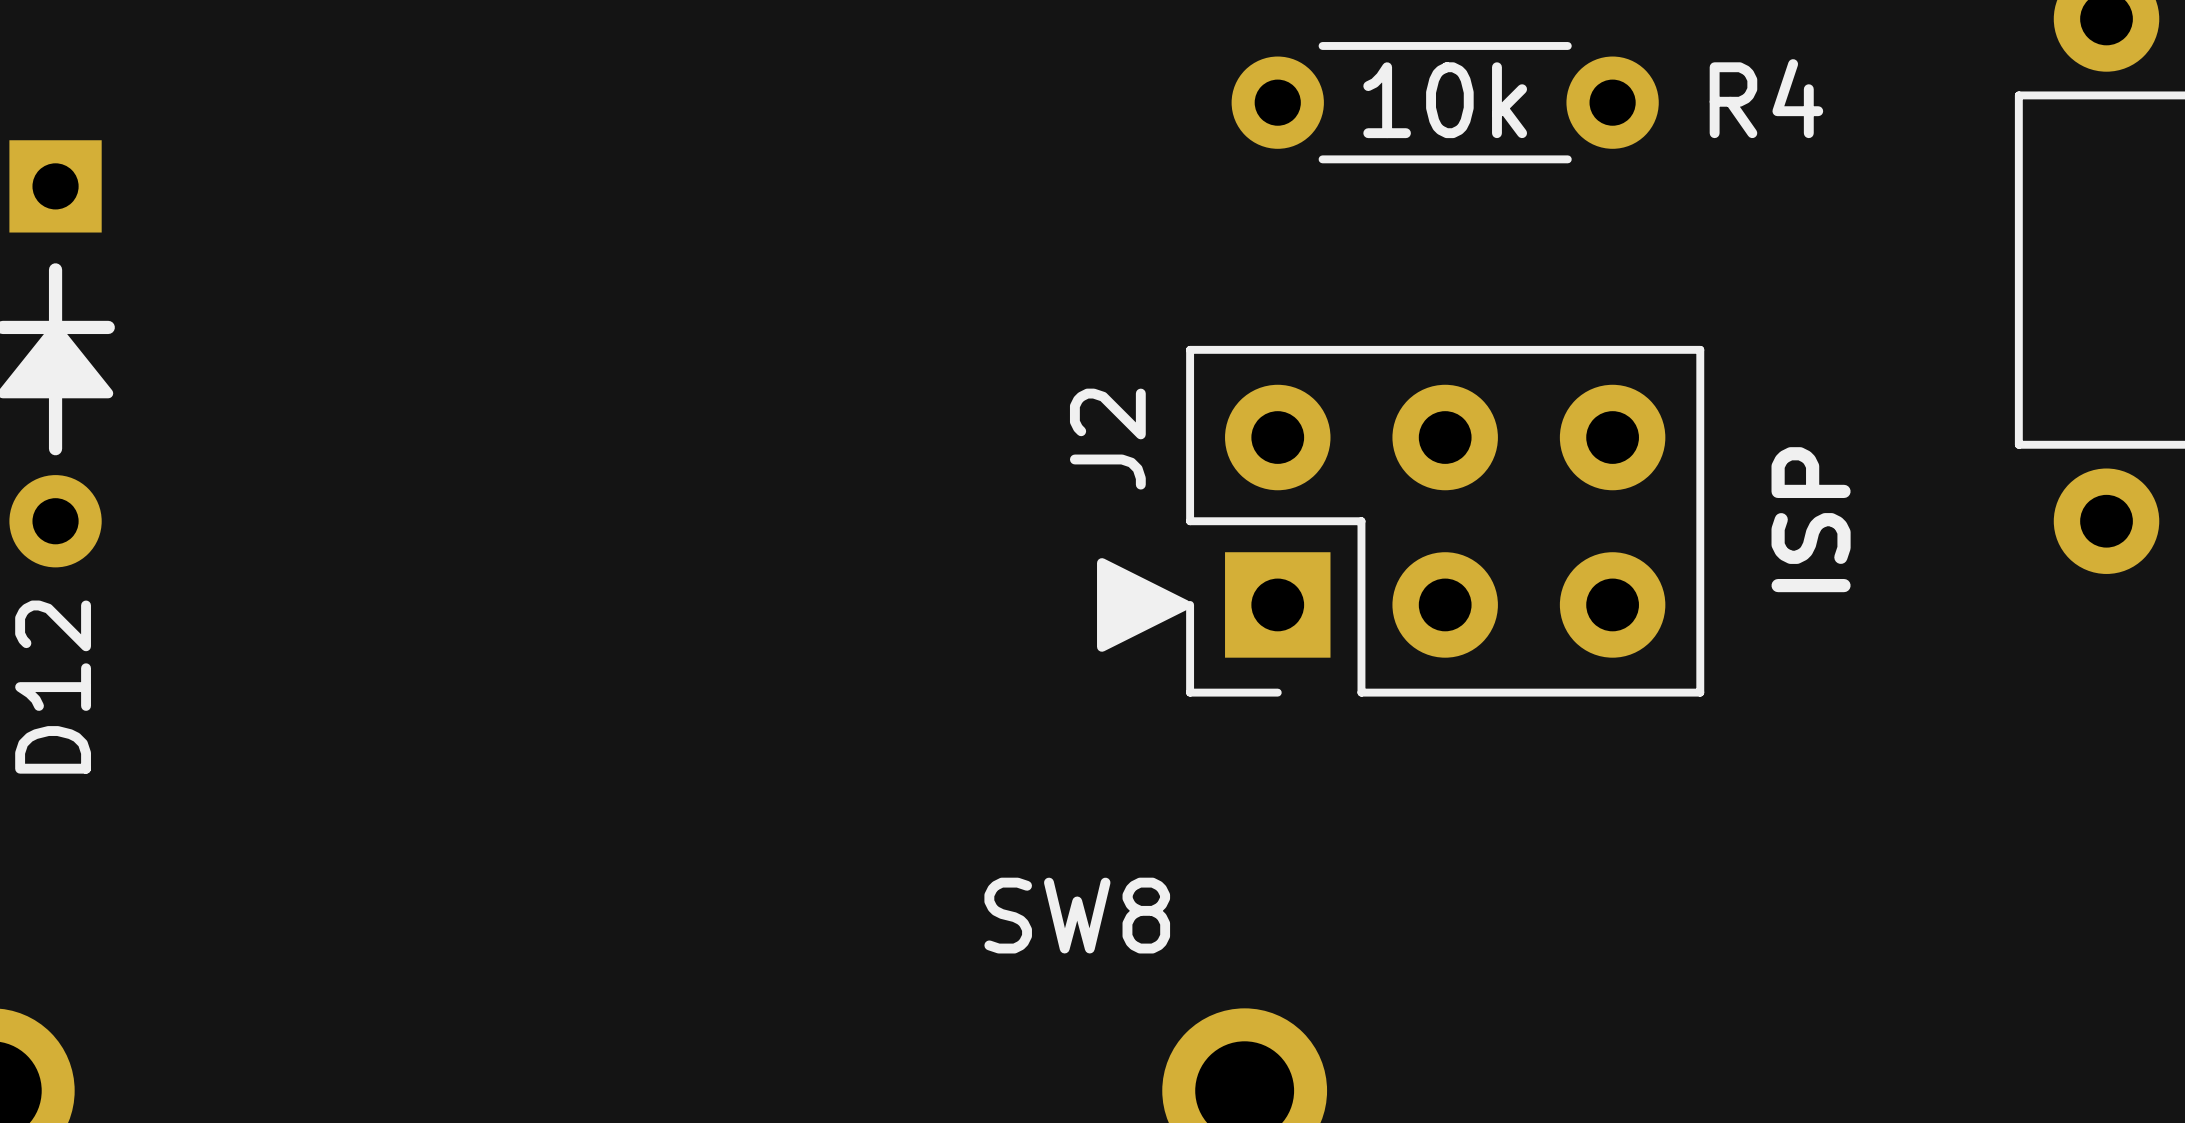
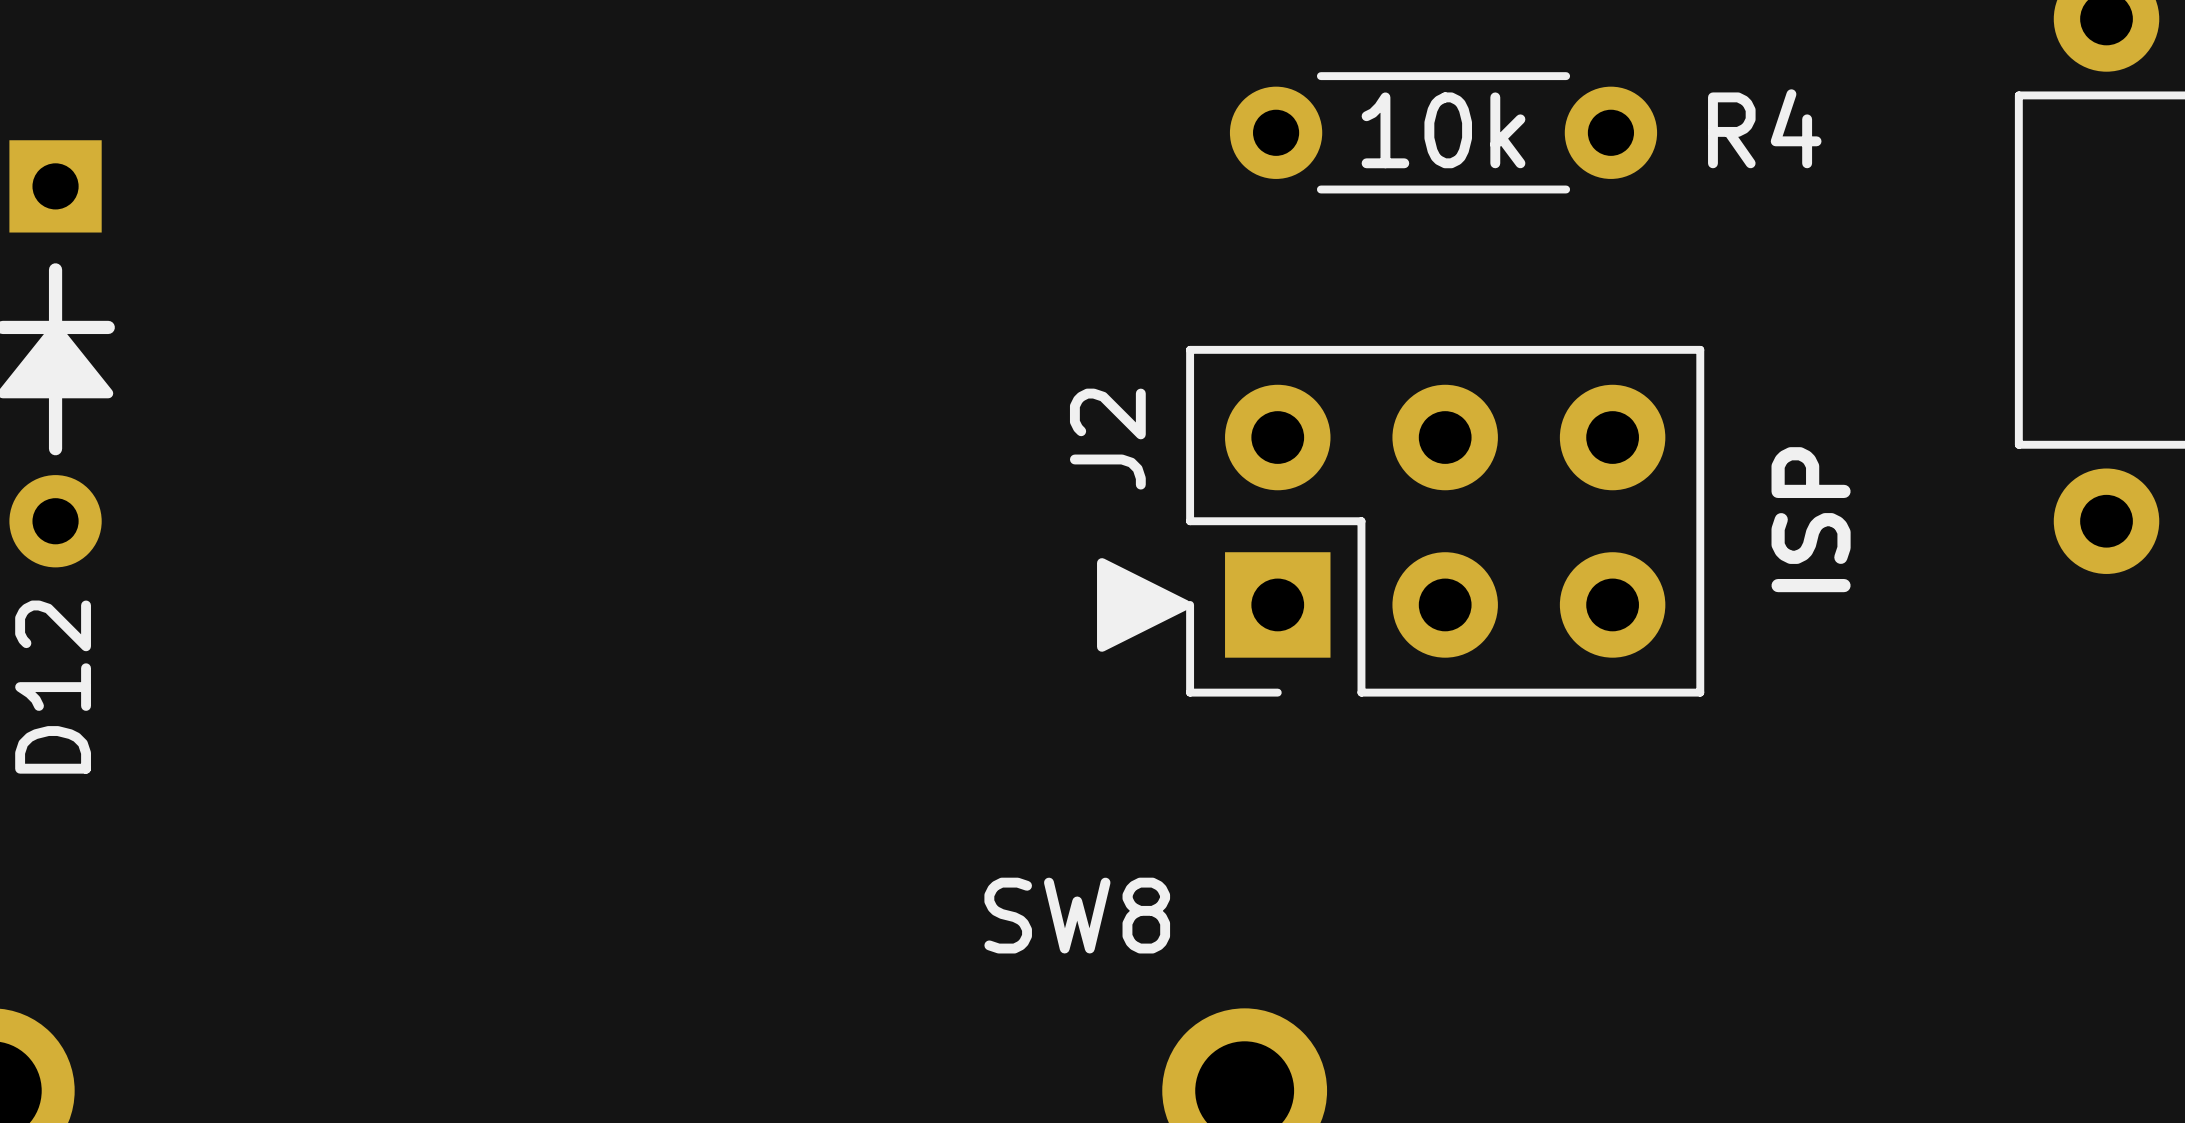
R4 position: (1445, 102) -> (1443, 132)

